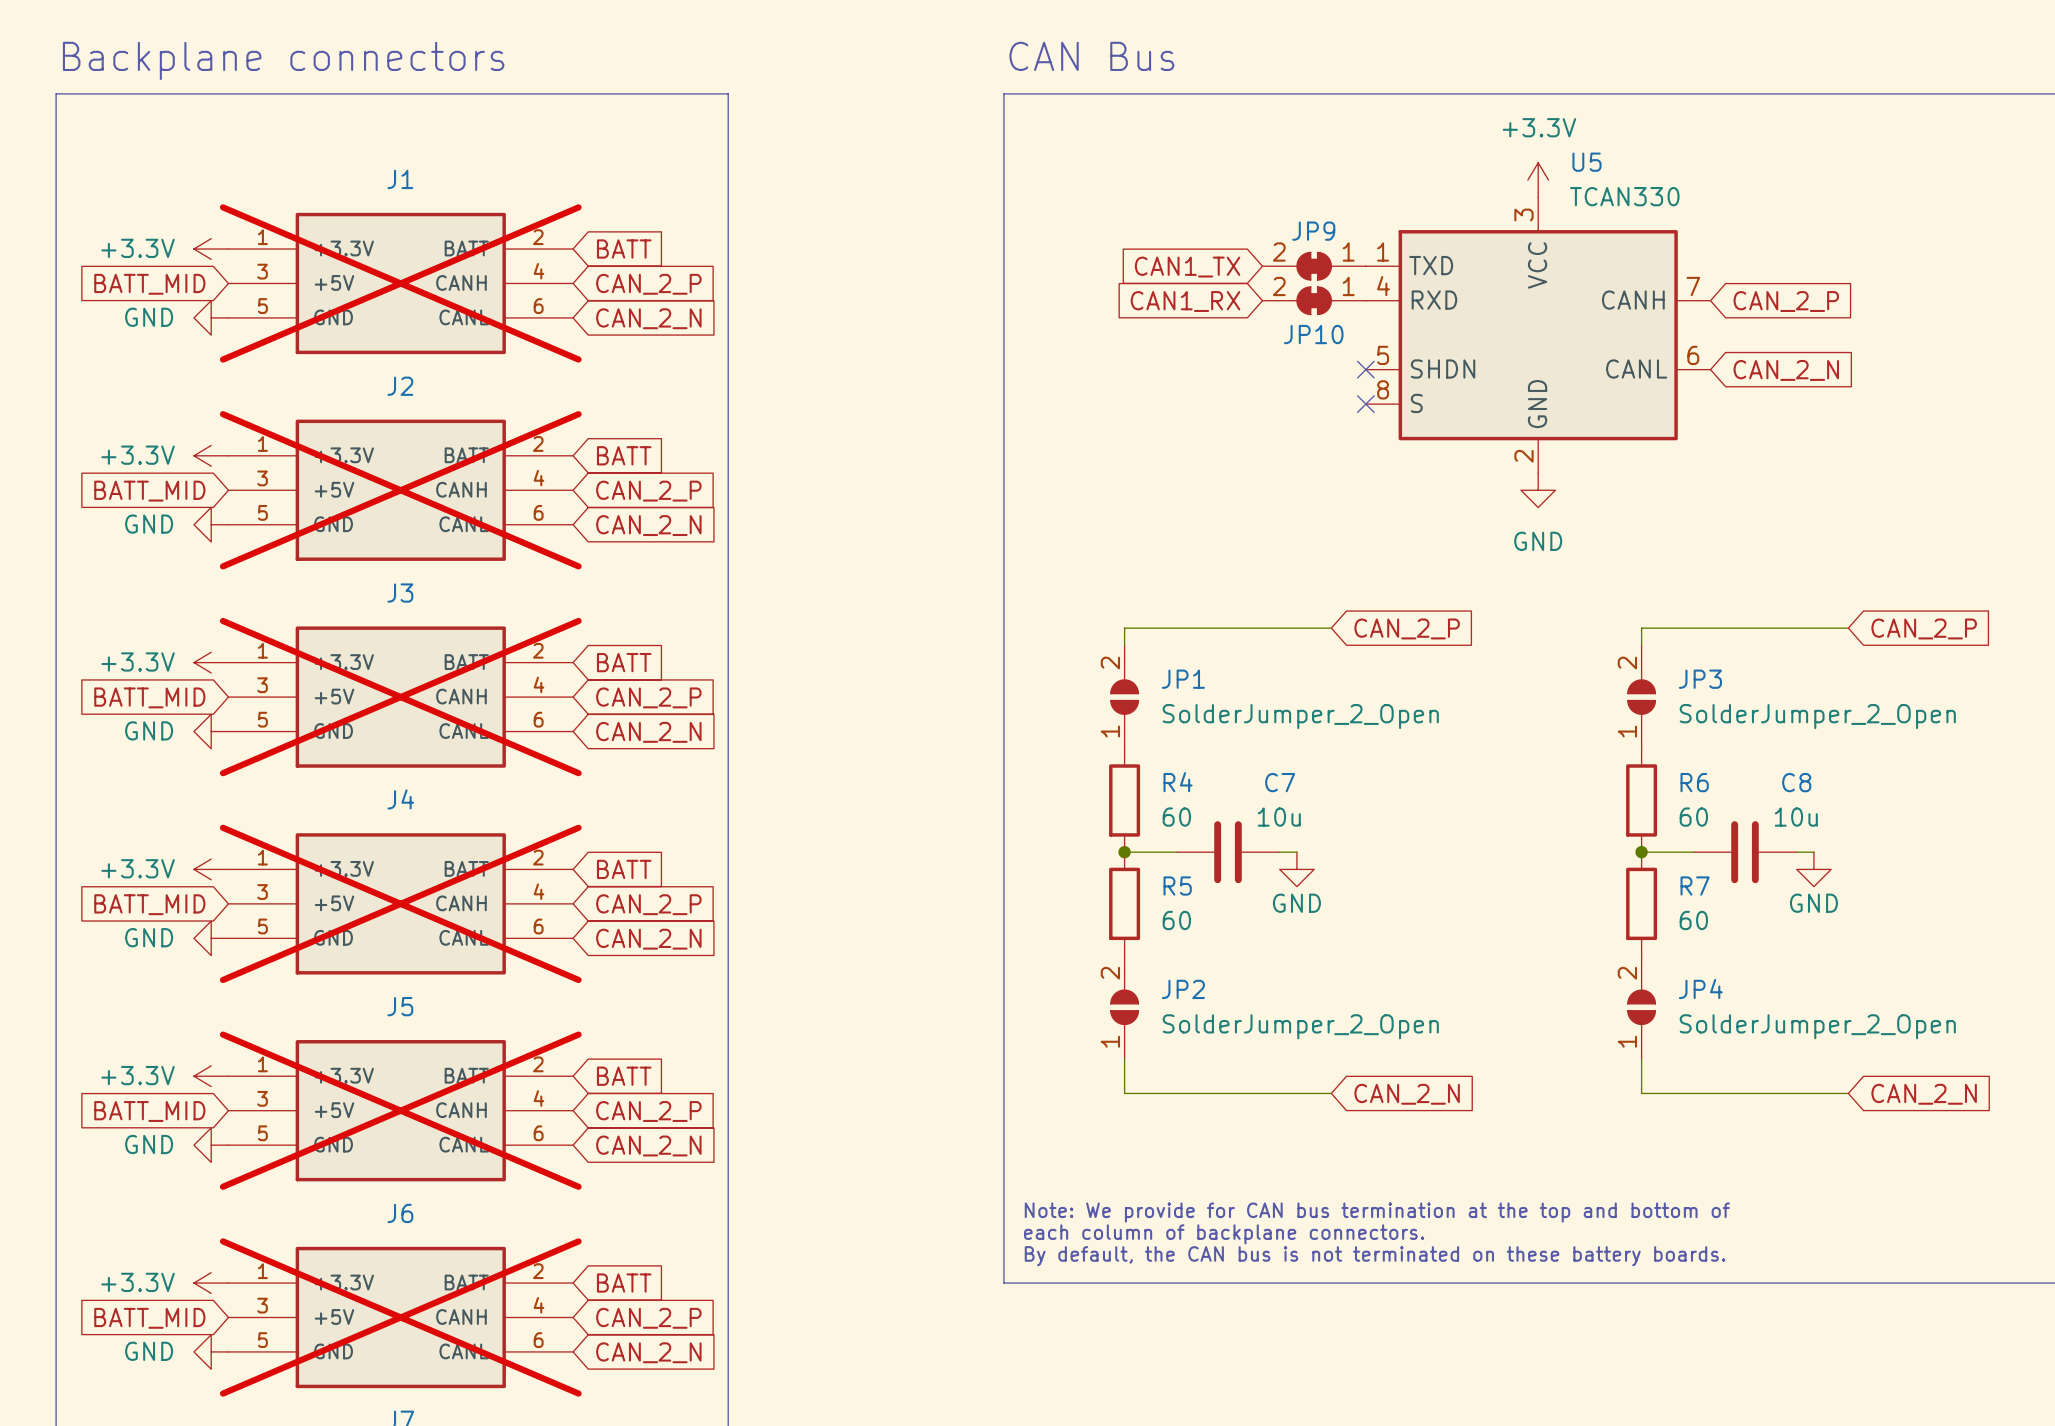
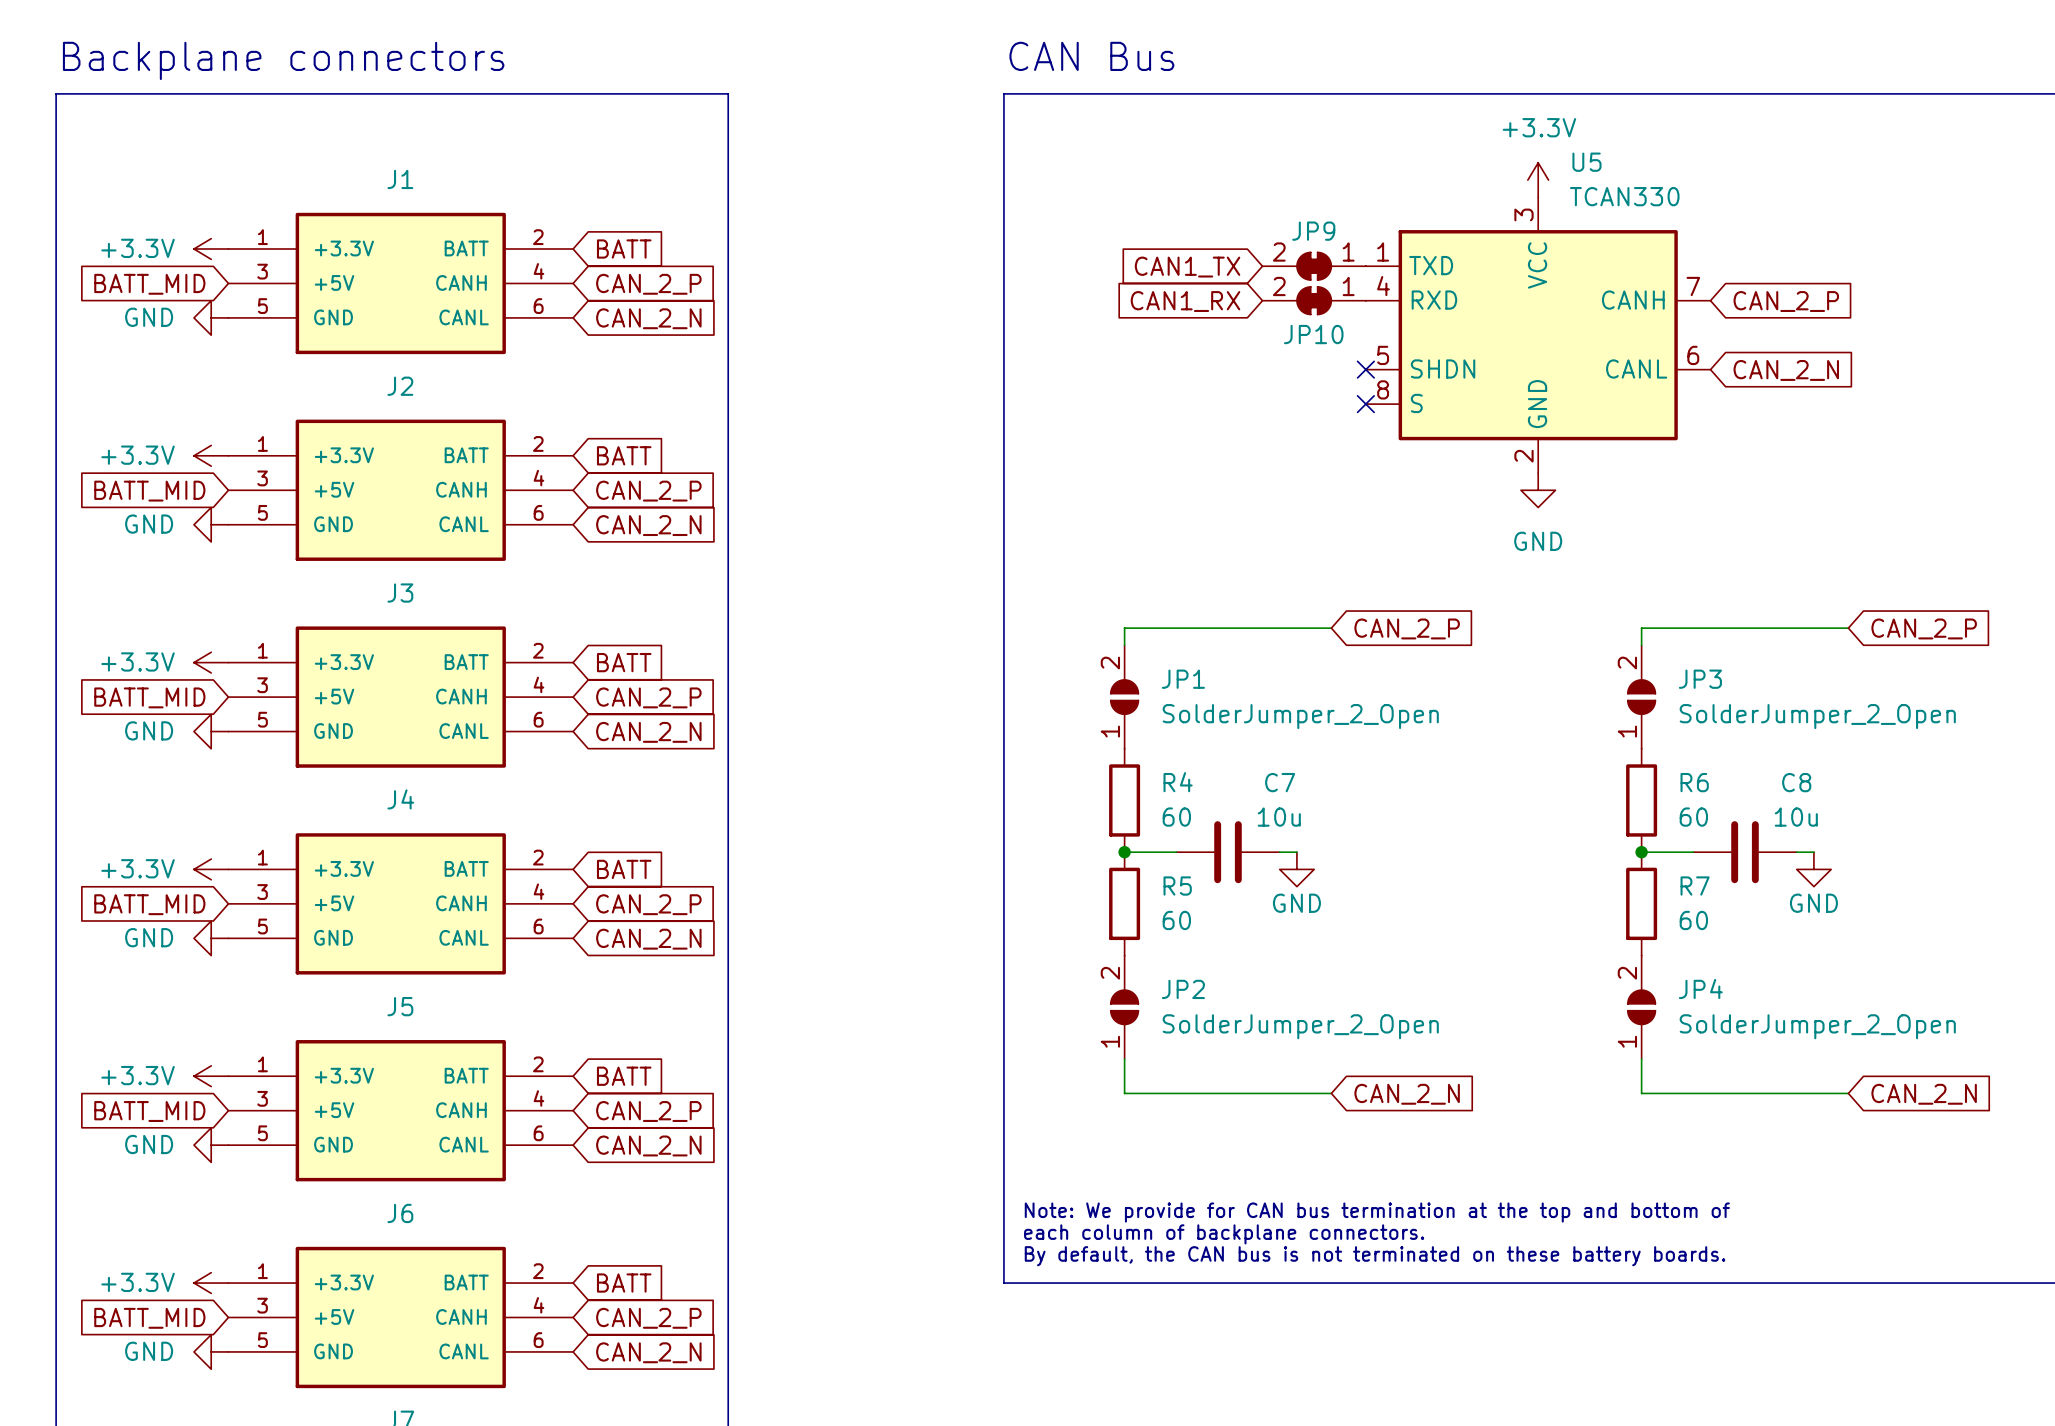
J1 do-not-place cross: (400, 283) -> none
J2 do-not-place cross: (400, 490) -> none
J3 do-not-place cross: (400, 697) -> none
J4 do-not-place cross: (400, 903) -> none
J5 do-not-place cross: (400, 1110) -> none
J6 do-not-place cross: (400, 1317) -> none

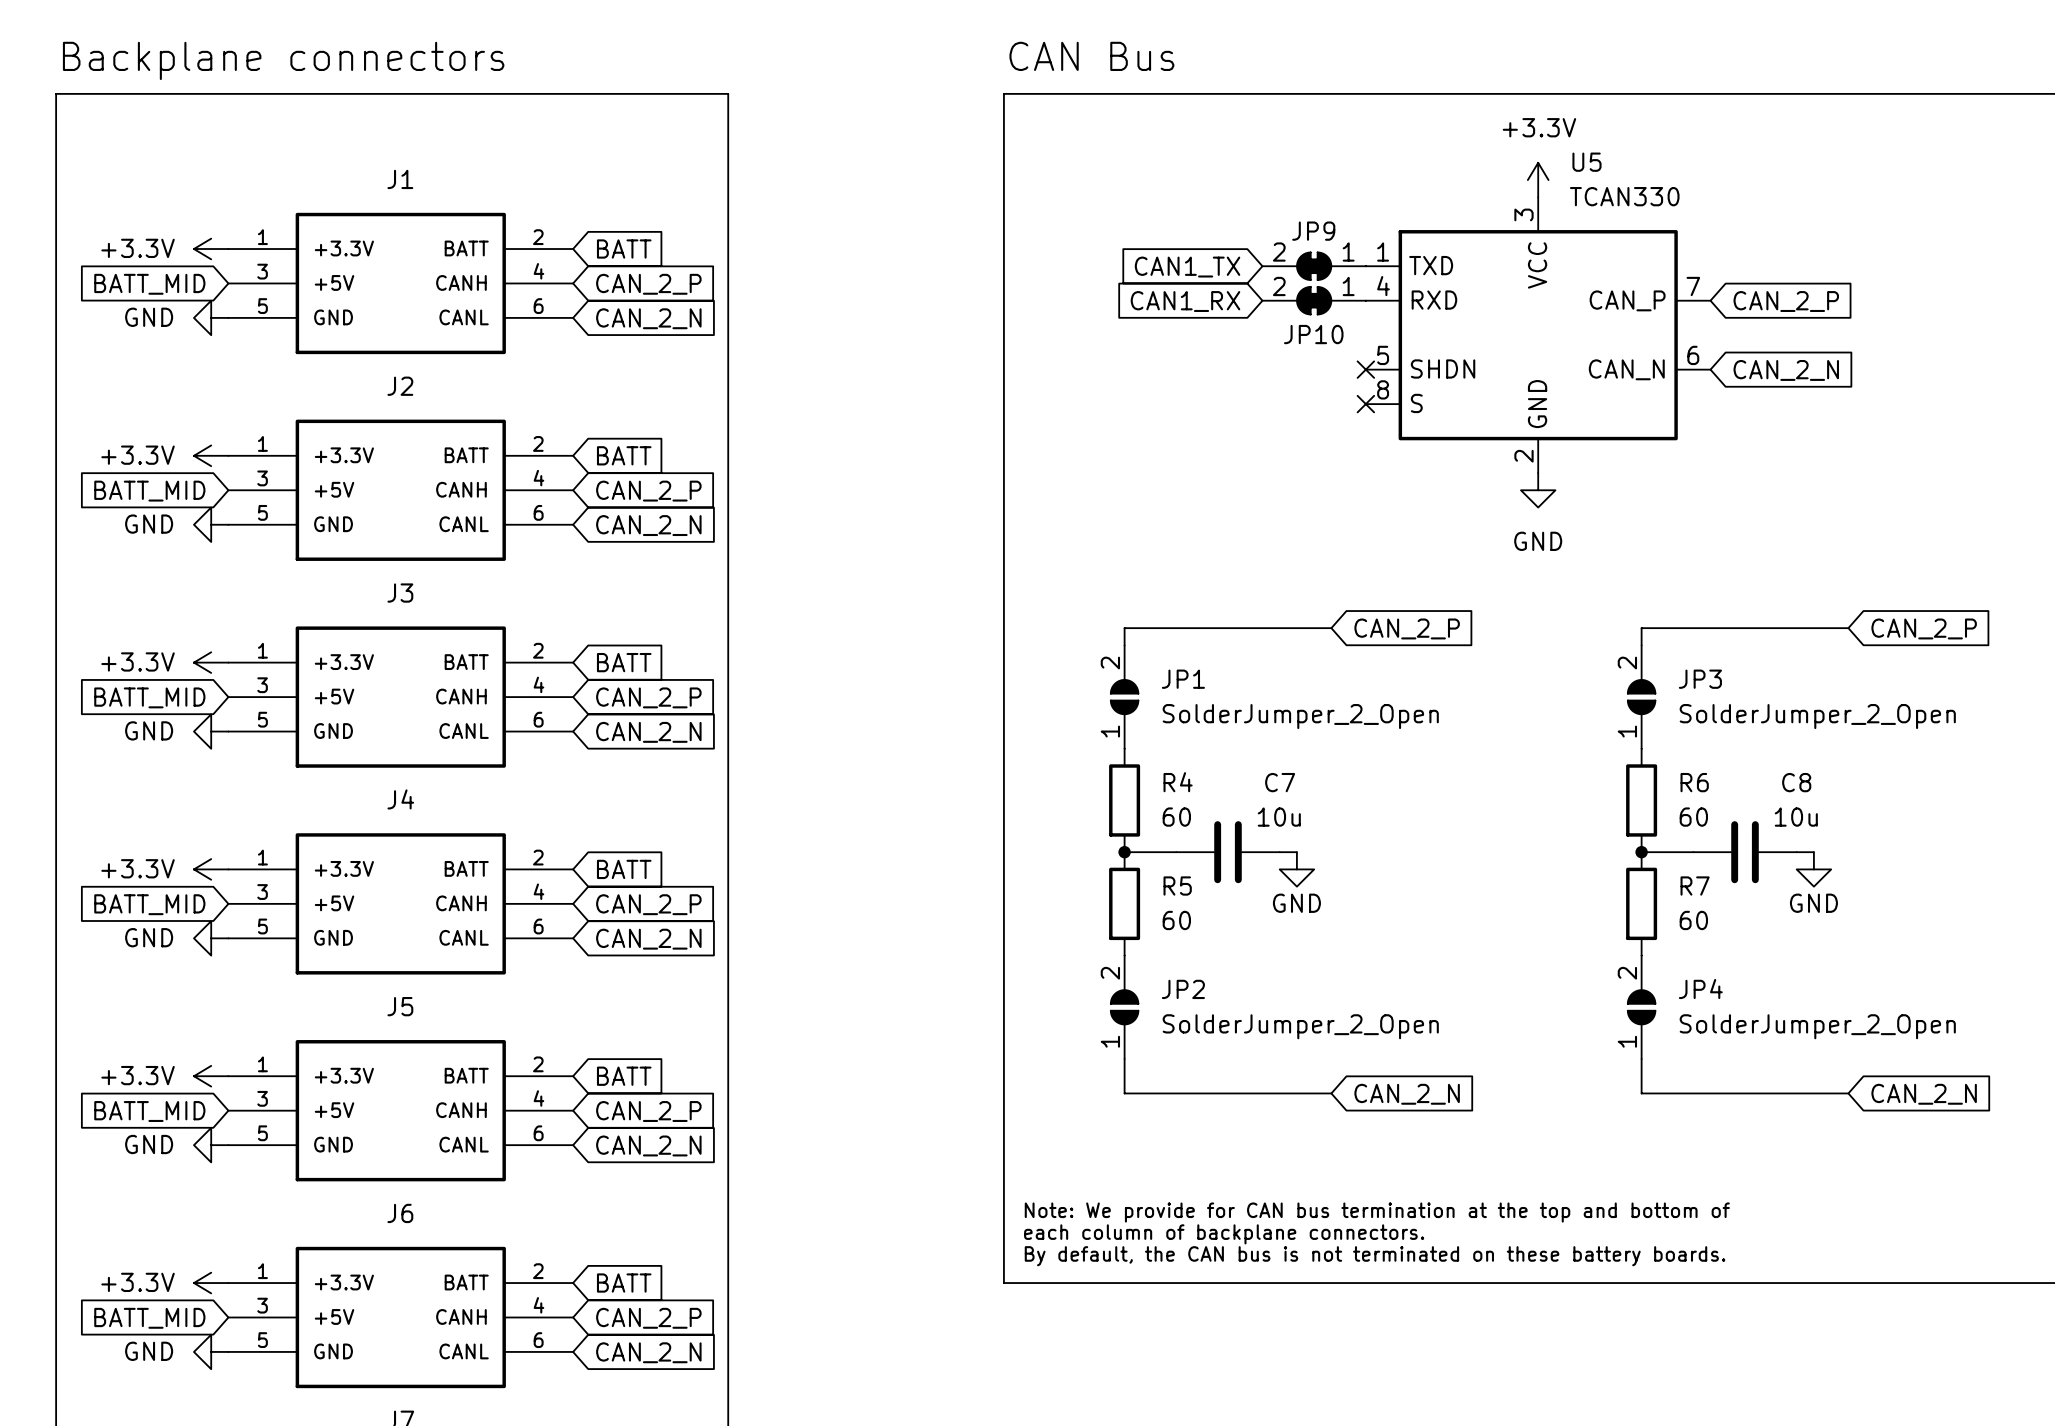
U5 pin name: CANH (1633, 300) -> CAN_P (1627, 300)
U5 pin name: CANL (1636, 368) -> CAN_N (1626, 369)

